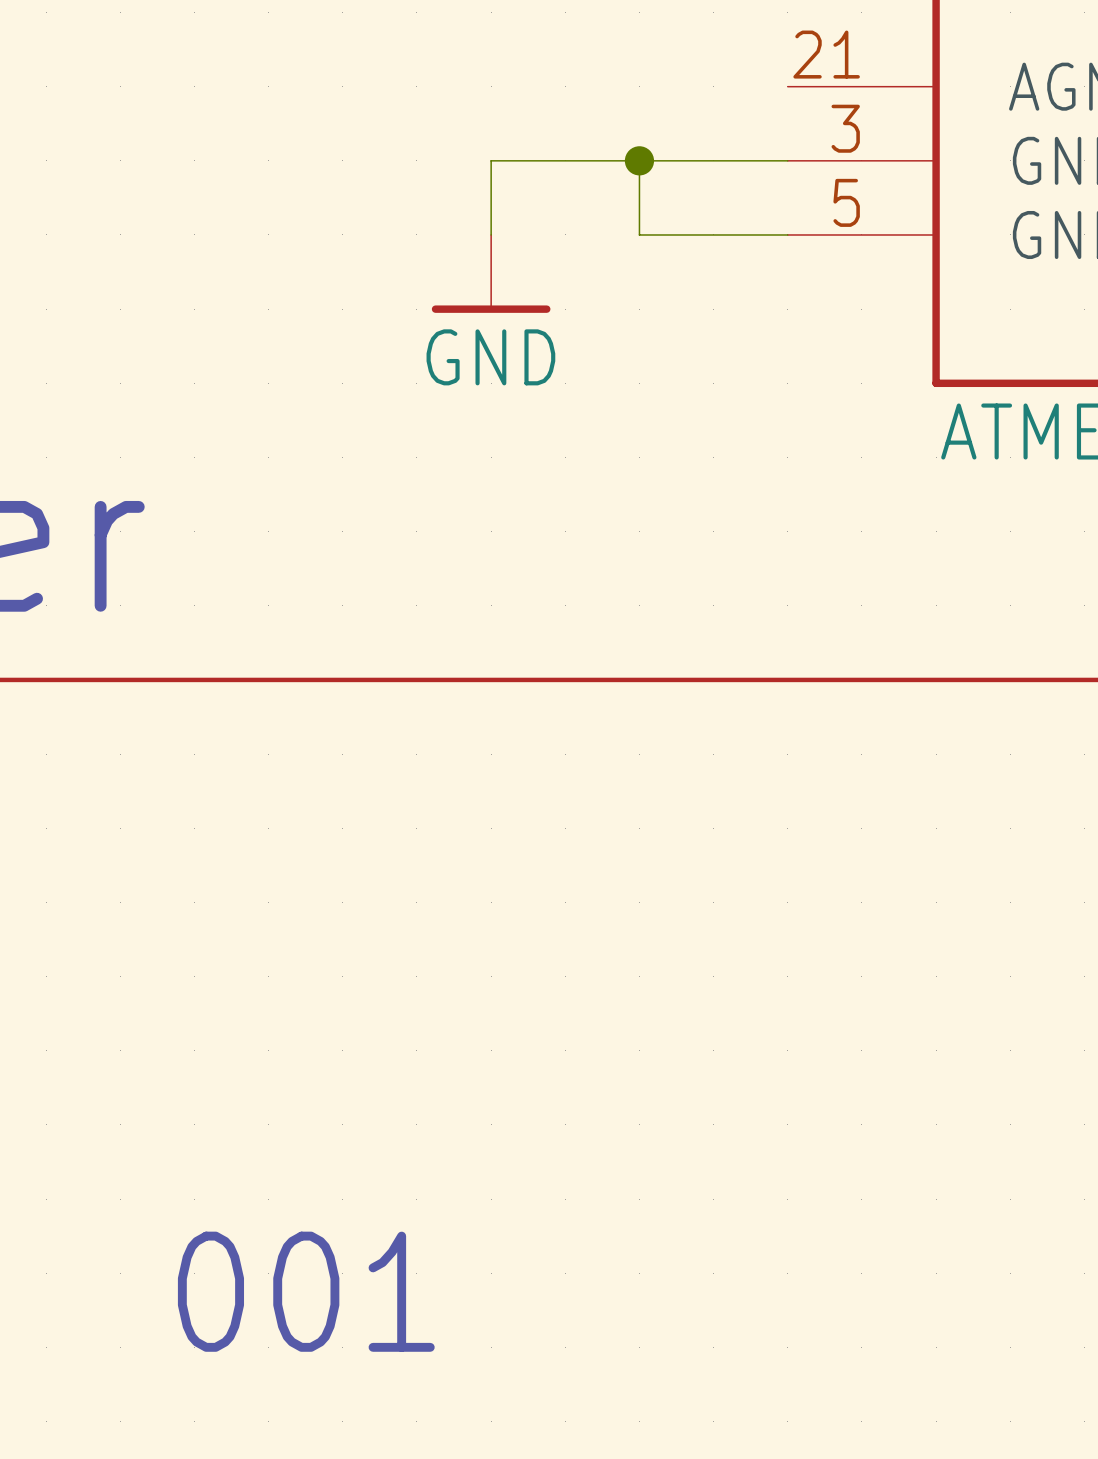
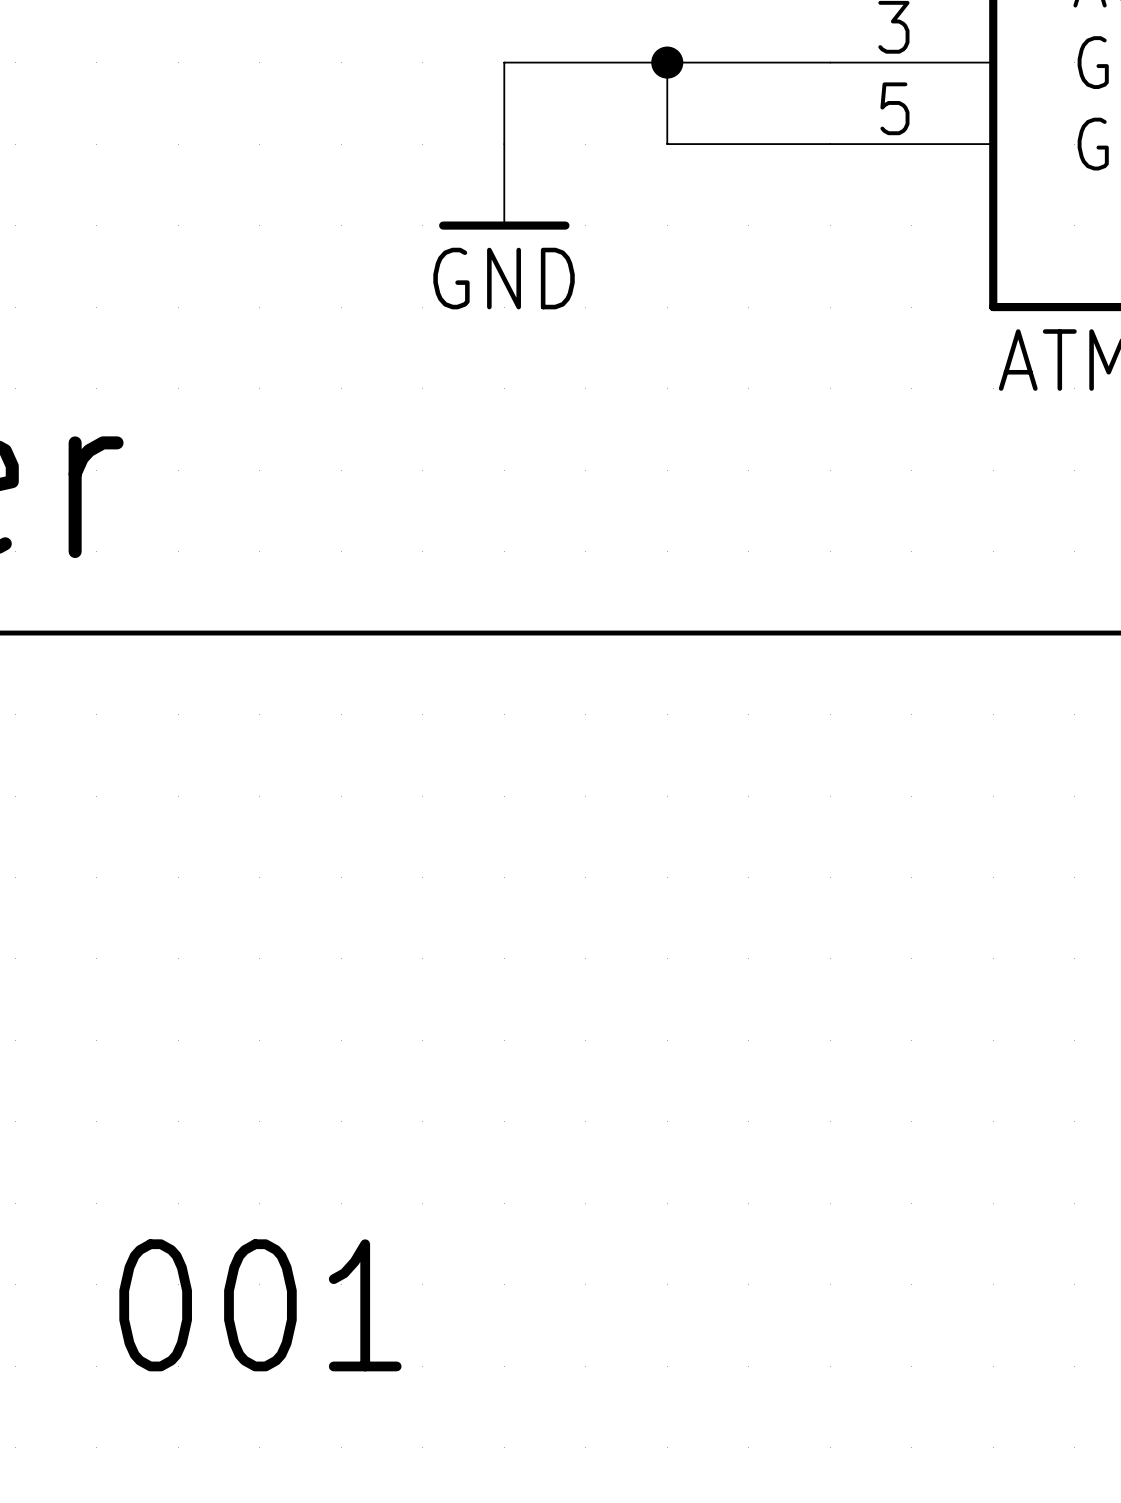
text position: 001 (306, 1291) -> 001 (260, 1305)

